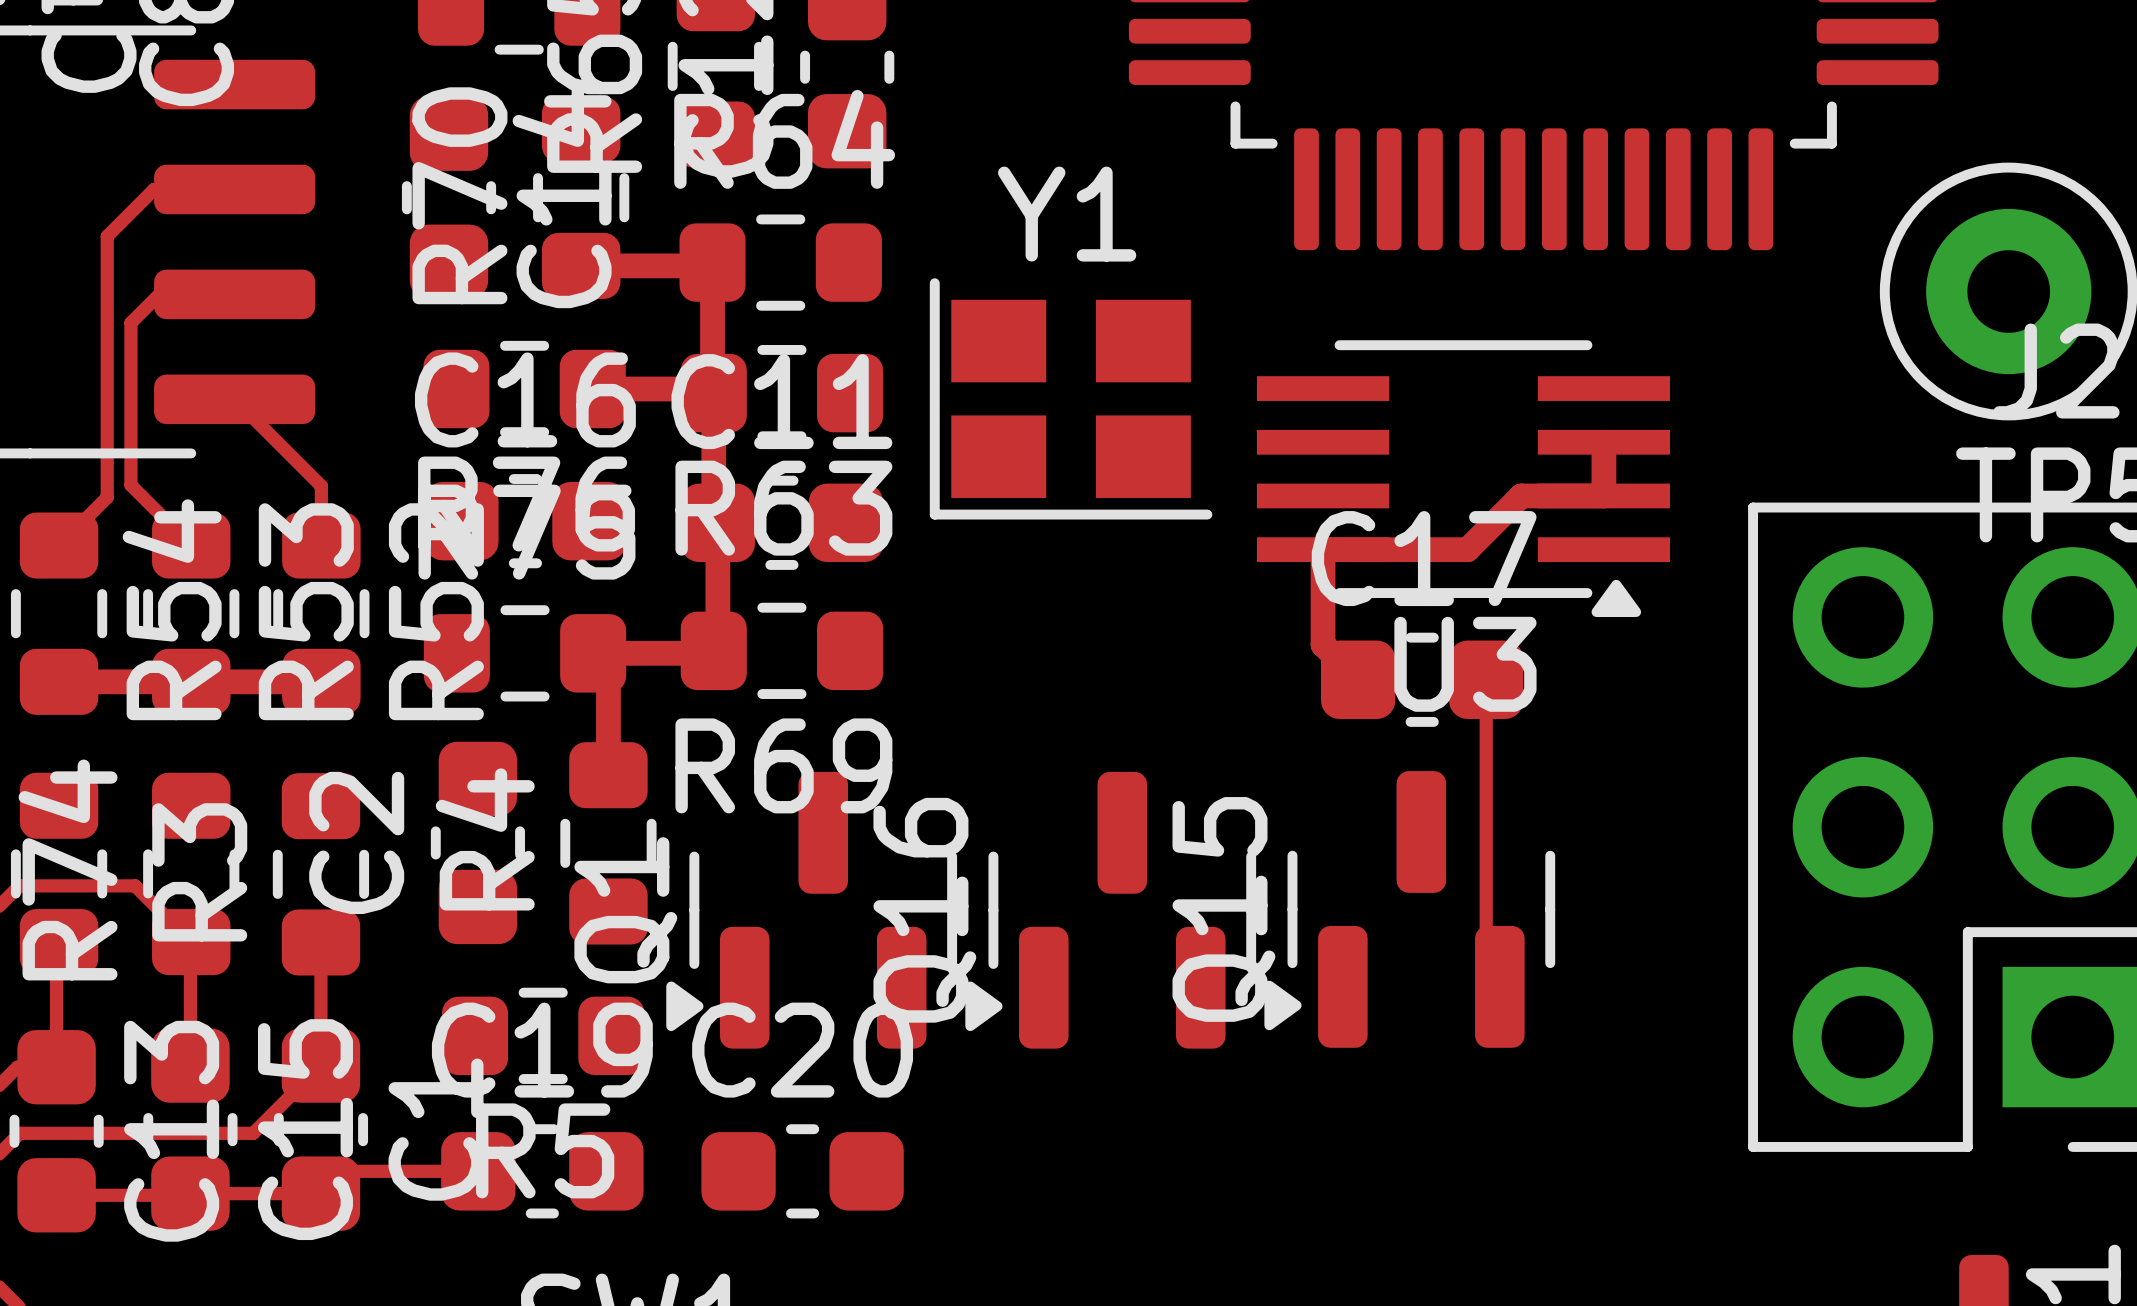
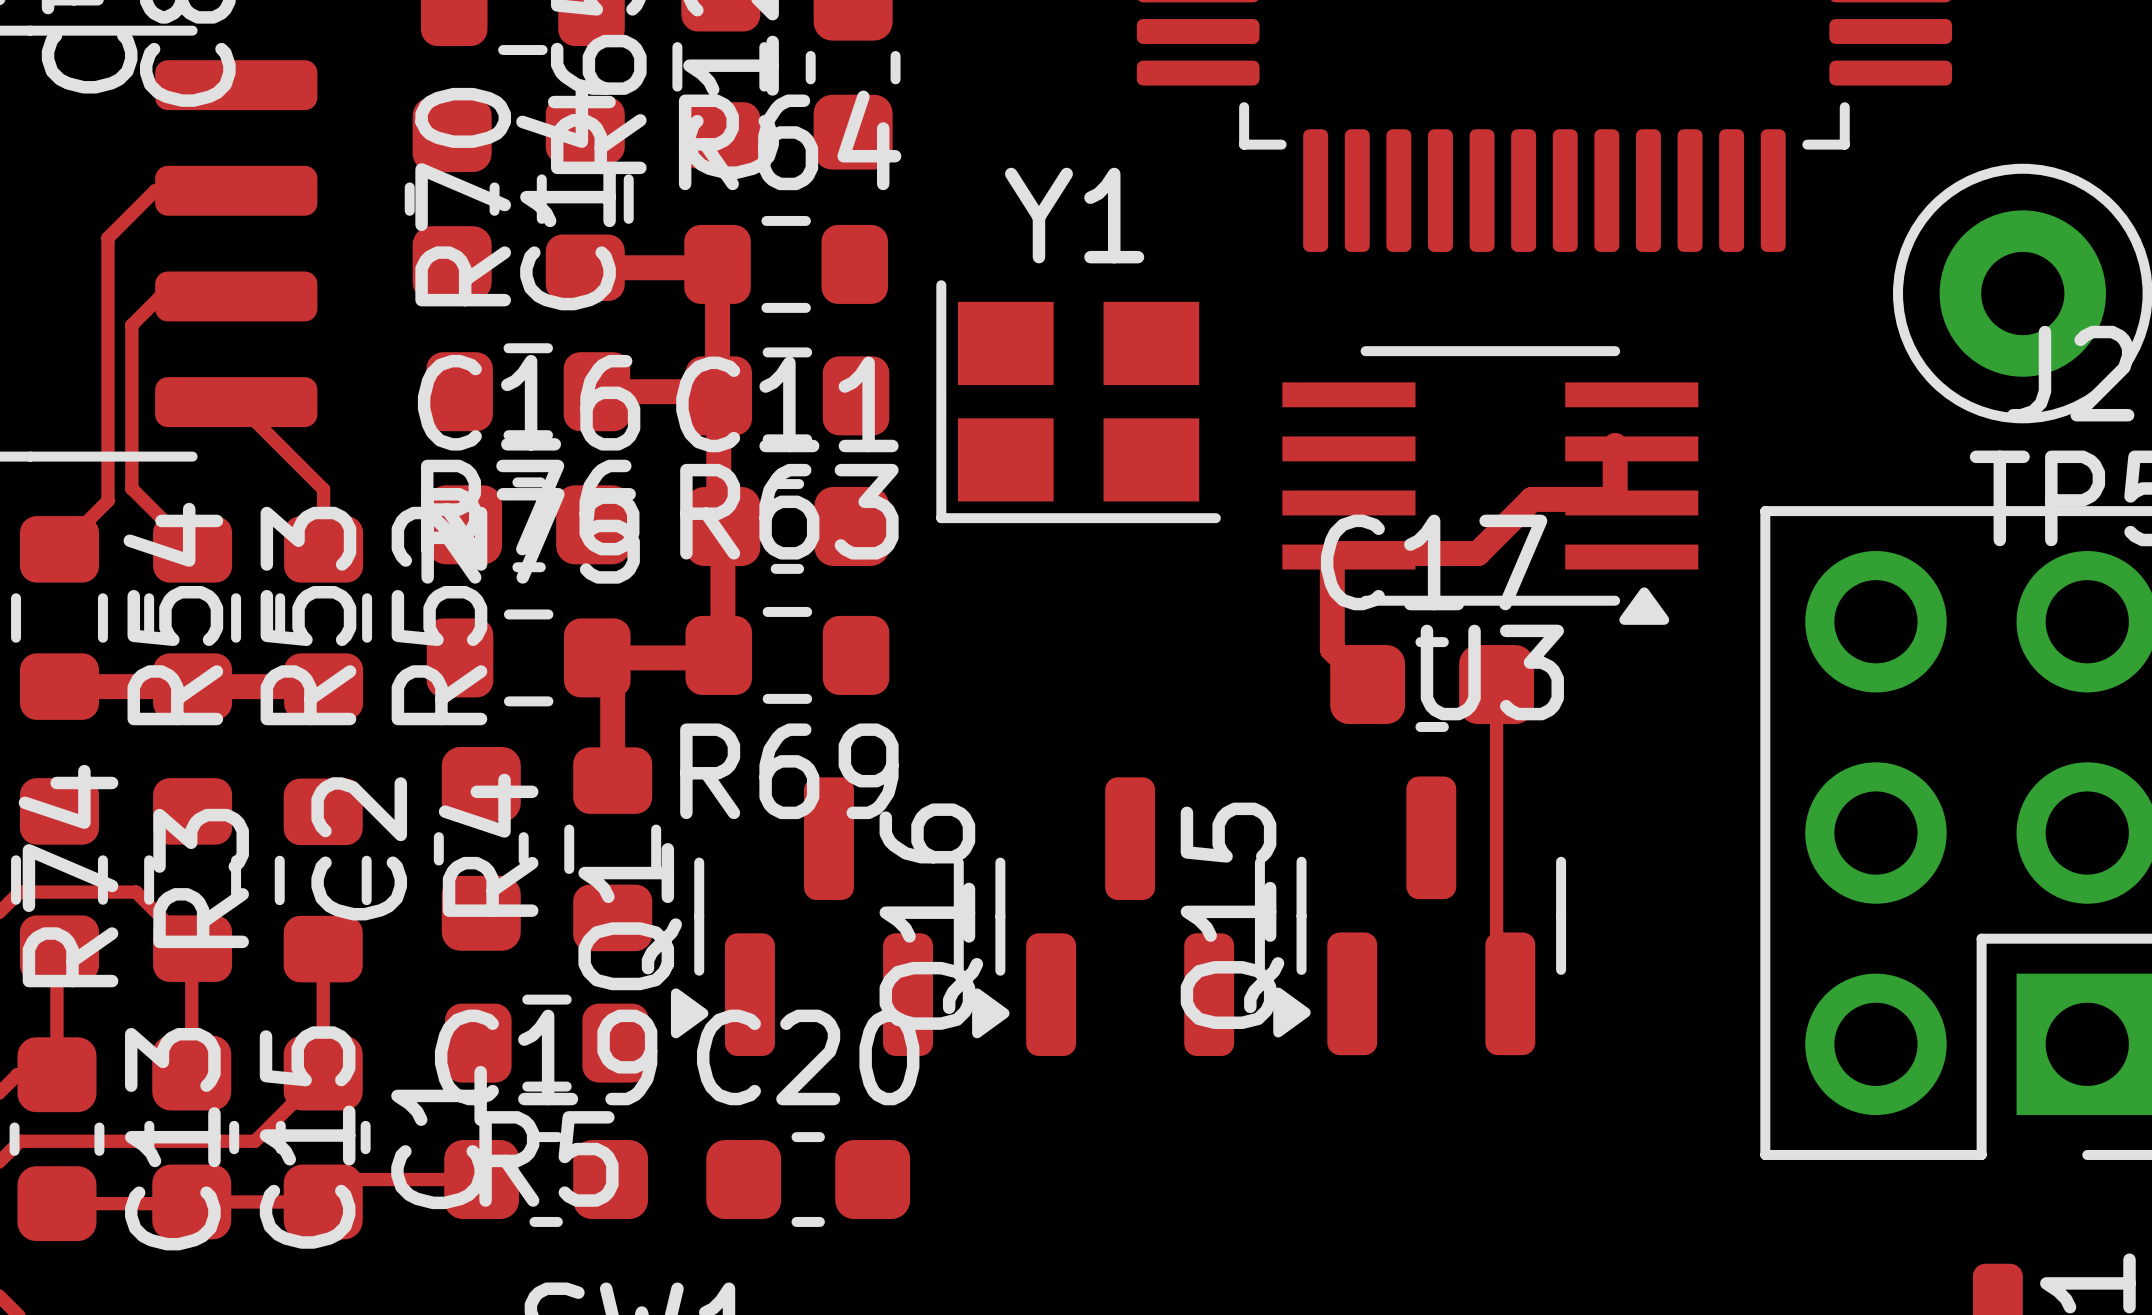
U3 position: (1463, 478) -> (1490, 485)

